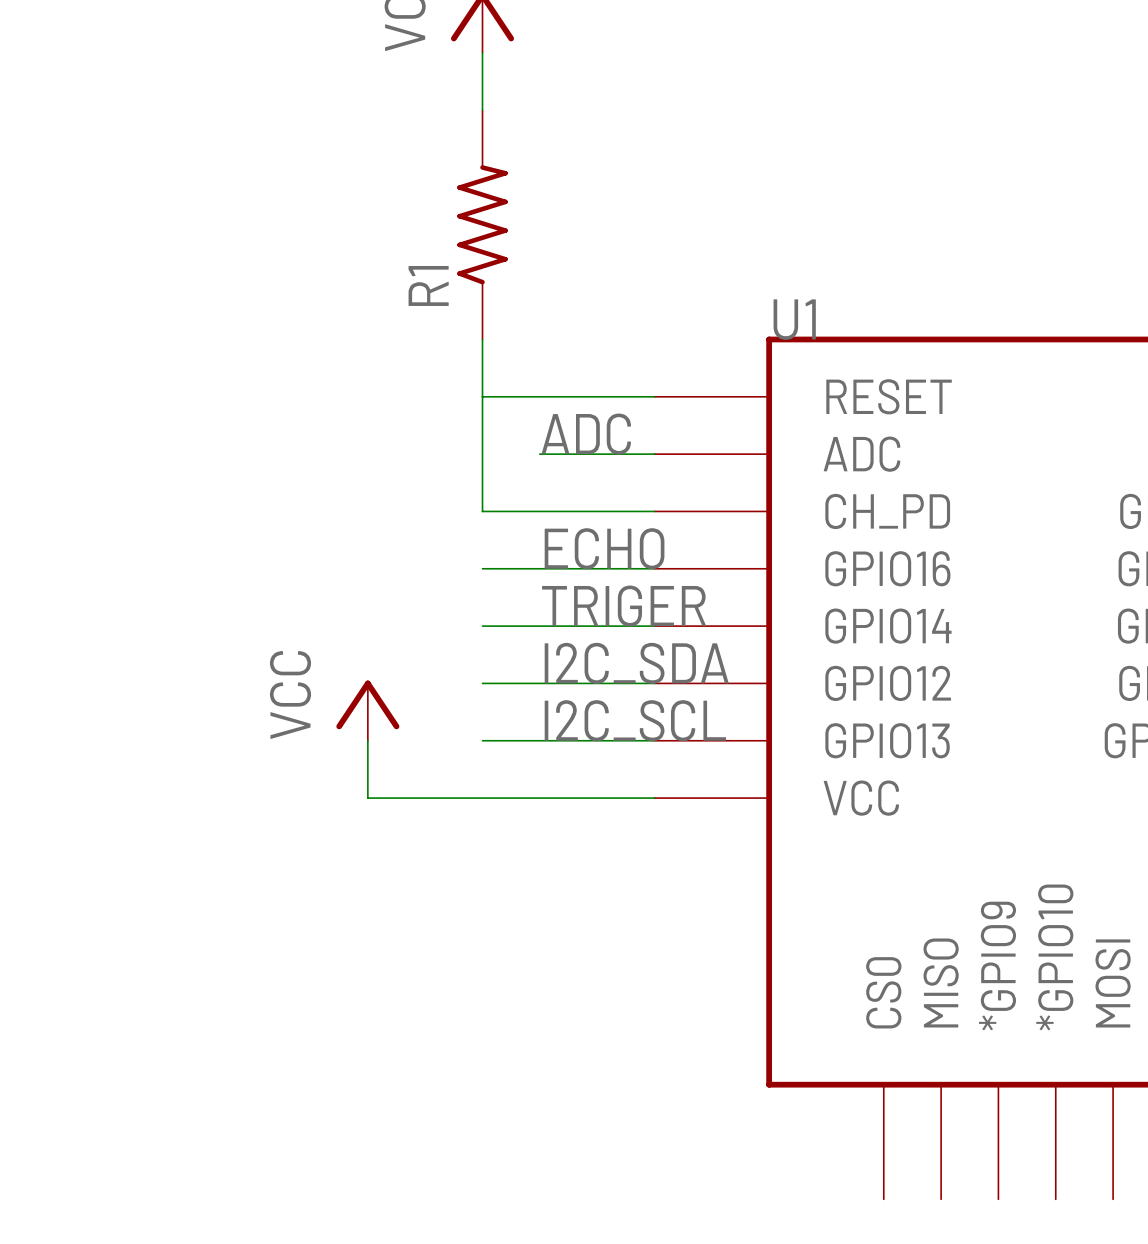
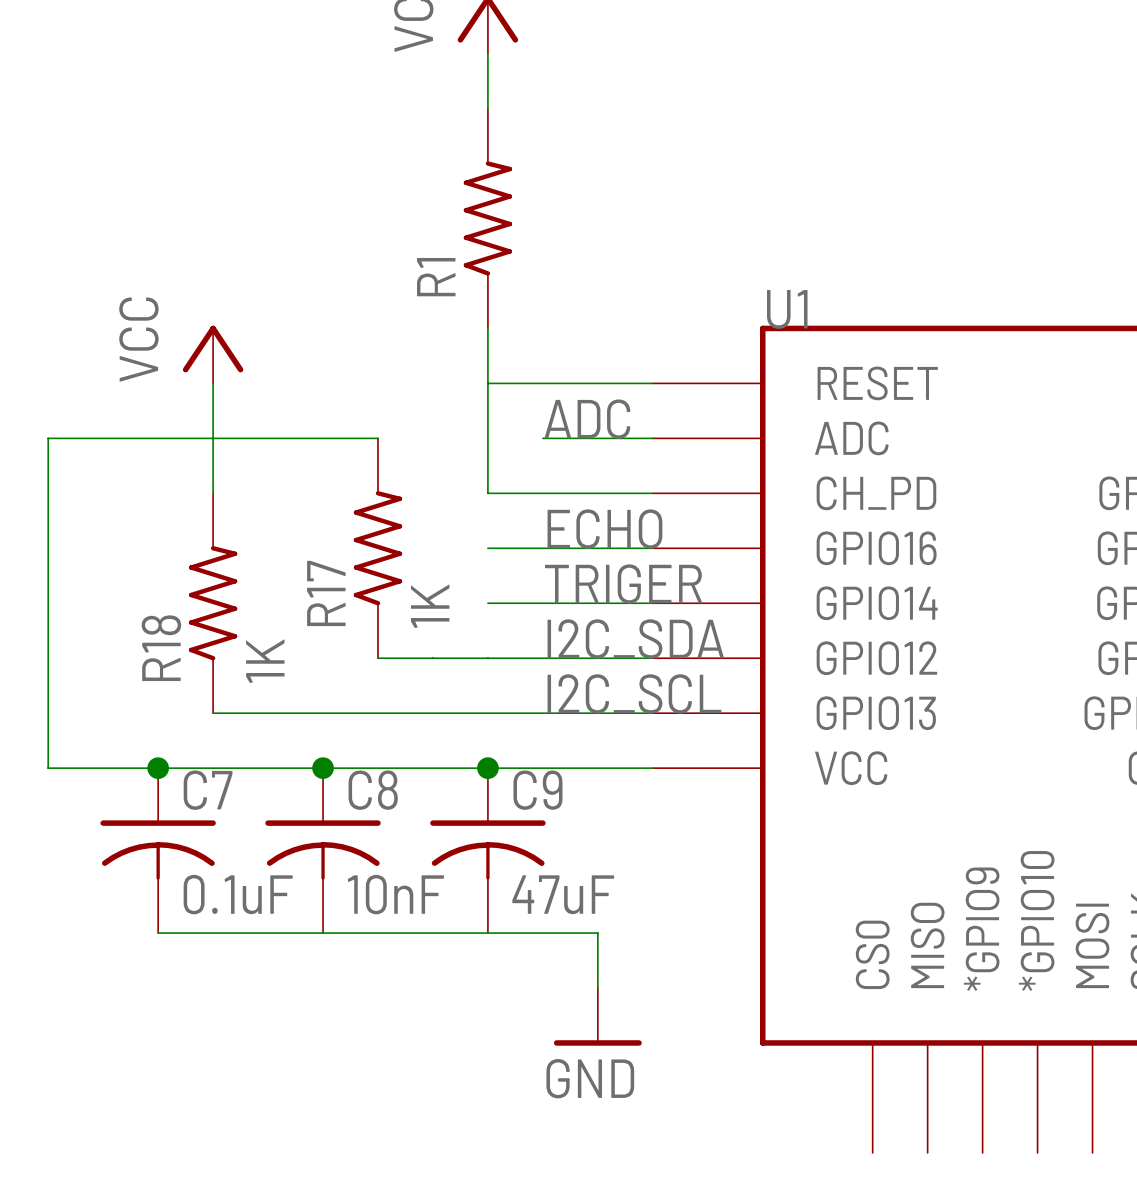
wire: none -> (213, 383) (213, 493)
R17: none -> 1K (378, 548)
R18: none -> 1K (213, 603)
wire: none -> (378, 658) (487, 658)
power symbol position: VCC (367, 710) -> VCC (213, 354)
wire: none -> (213, 713) (487, 713)
wire: (367, 740) (367, 798) -> (378, 438) (48, 438) (48, 768) (378, 768)
junction: none -> (158, 768)
junction: none -> (323, 768)
junction: none -> (487, 768)
C7: none -> 0.1uF (158, 850)
C8: none -> 10nF (323, 850)
C9: none -> 47uF (487, 850)
wire: none -> (158, 933) (597, 933) (597, 988)
power symbol: none -> GND (597, 1016)

